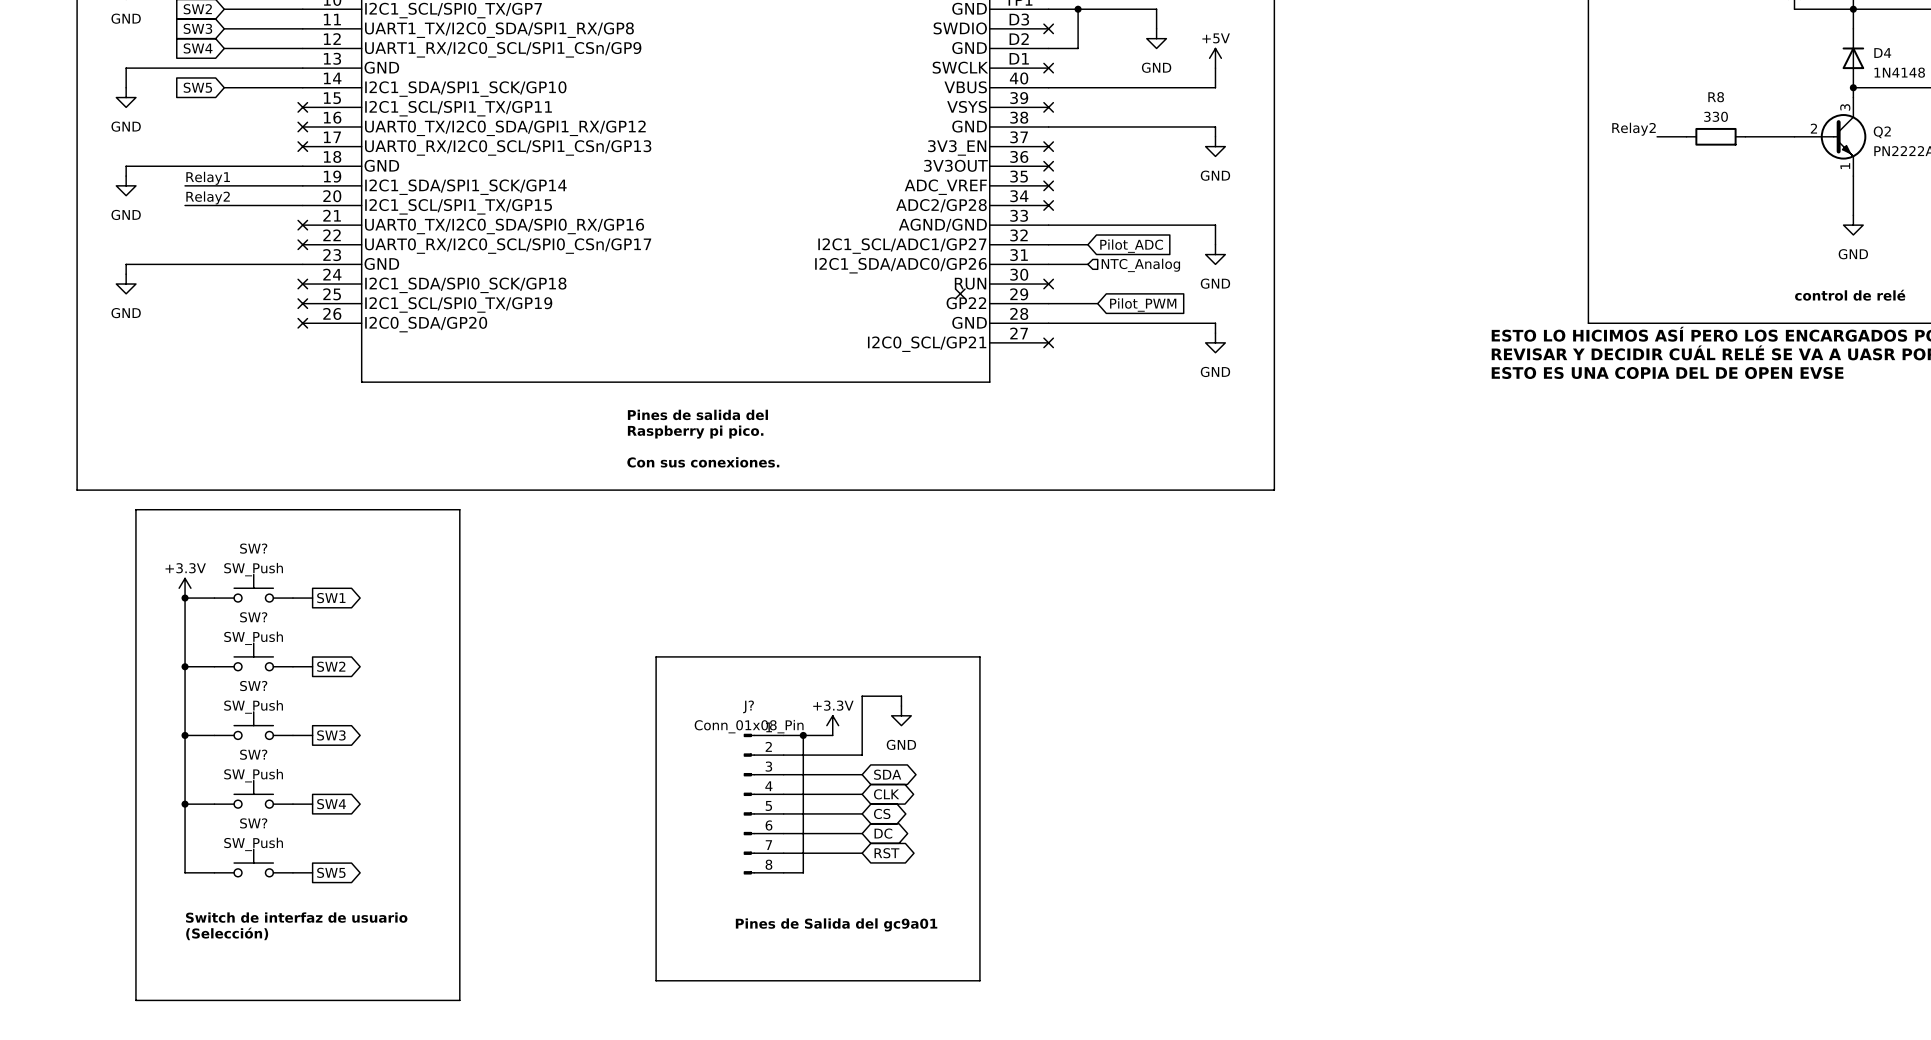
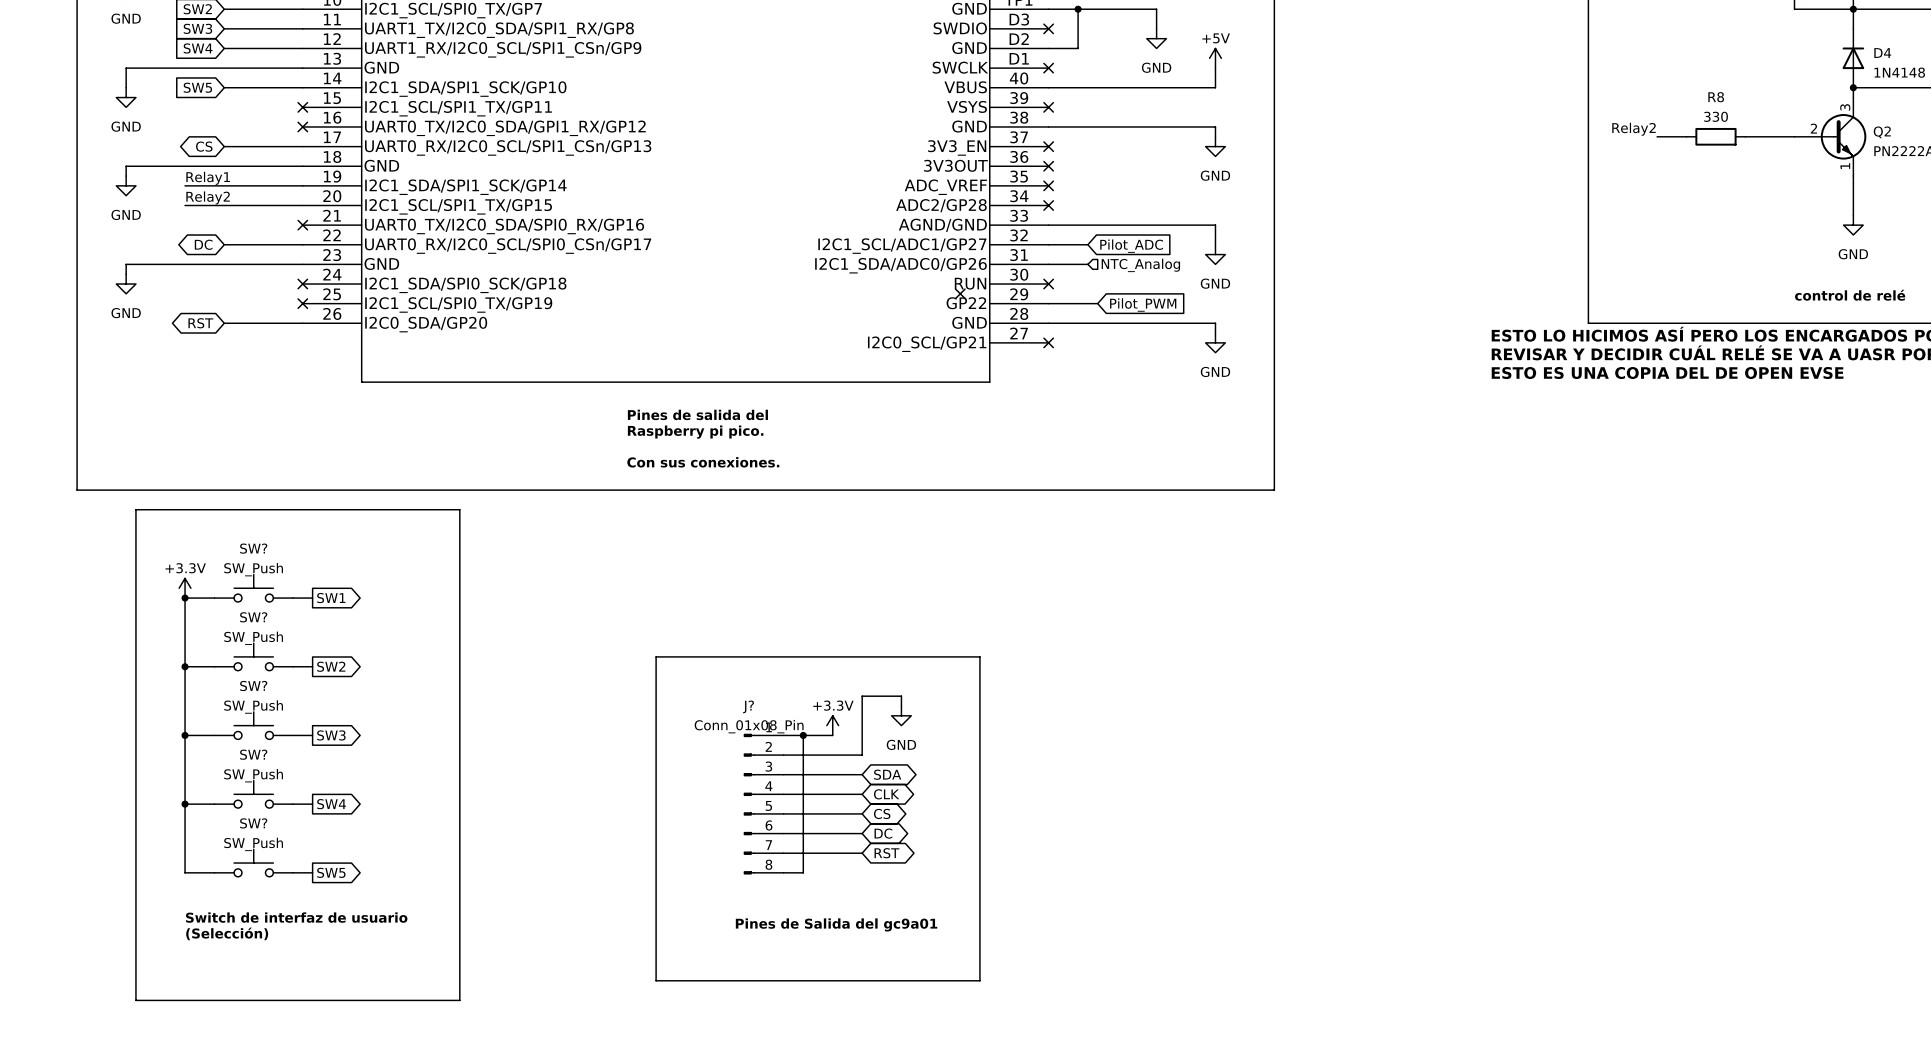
global label: none -> CS (204, 146)
wire: none -> (224, 146) (302, 146)
no-connect mark: (302, 146) -> none
global label: none -> DC (203, 244)
wire: none -> (224, 244) (302, 244)
no-connect mark: (302, 244) -> none
global label: none -> RST (200, 323)
wire: none -> (224, 323) (302, 323)
no-connect mark: (302, 323) -> none

